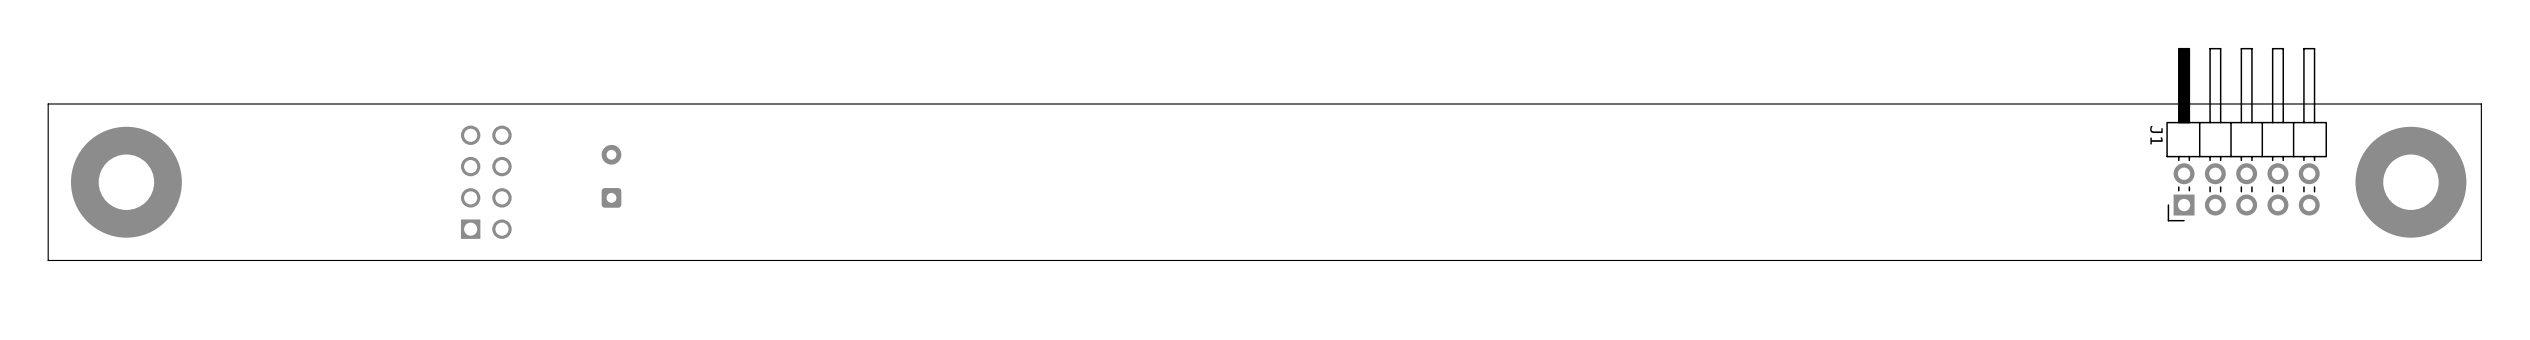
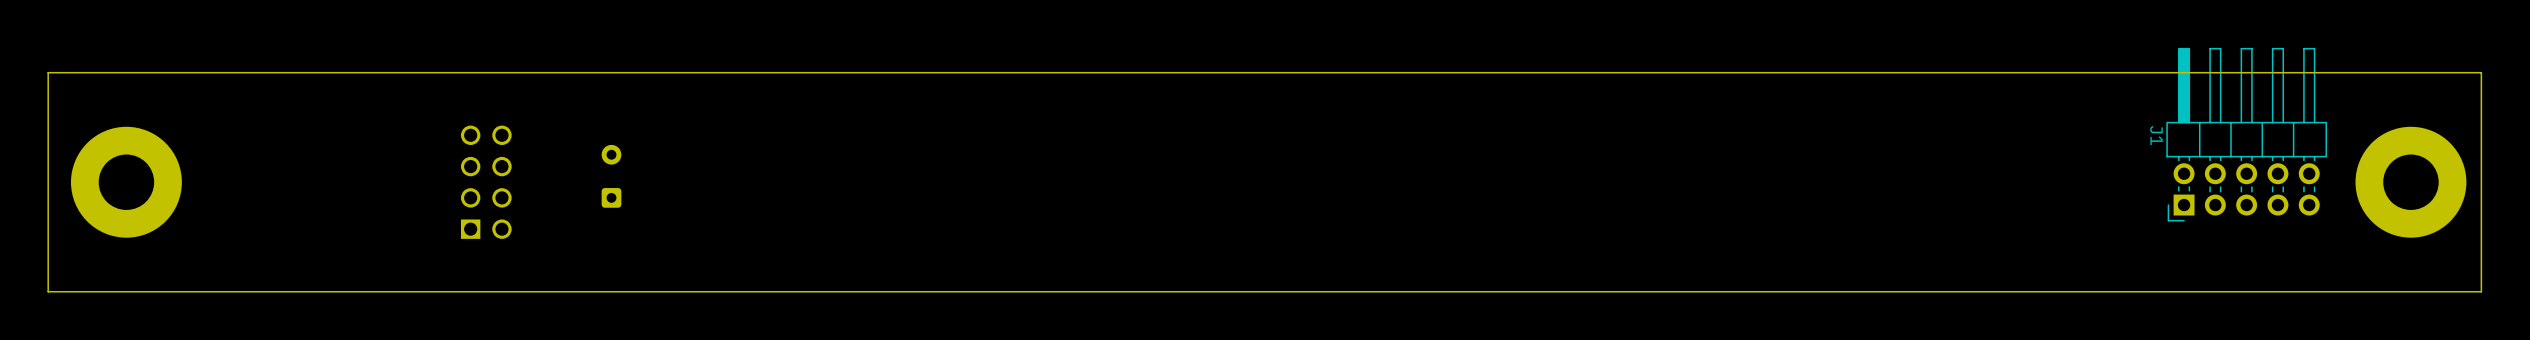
board edge: (2481, 103) (48, 103) -> (2481, 103) (2481, 72) (48, 72) (48, 103)
board edge: (2481, 260) (48, 260) -> (2481, 260) (2481, 291) (48, 291) (48, 260)

